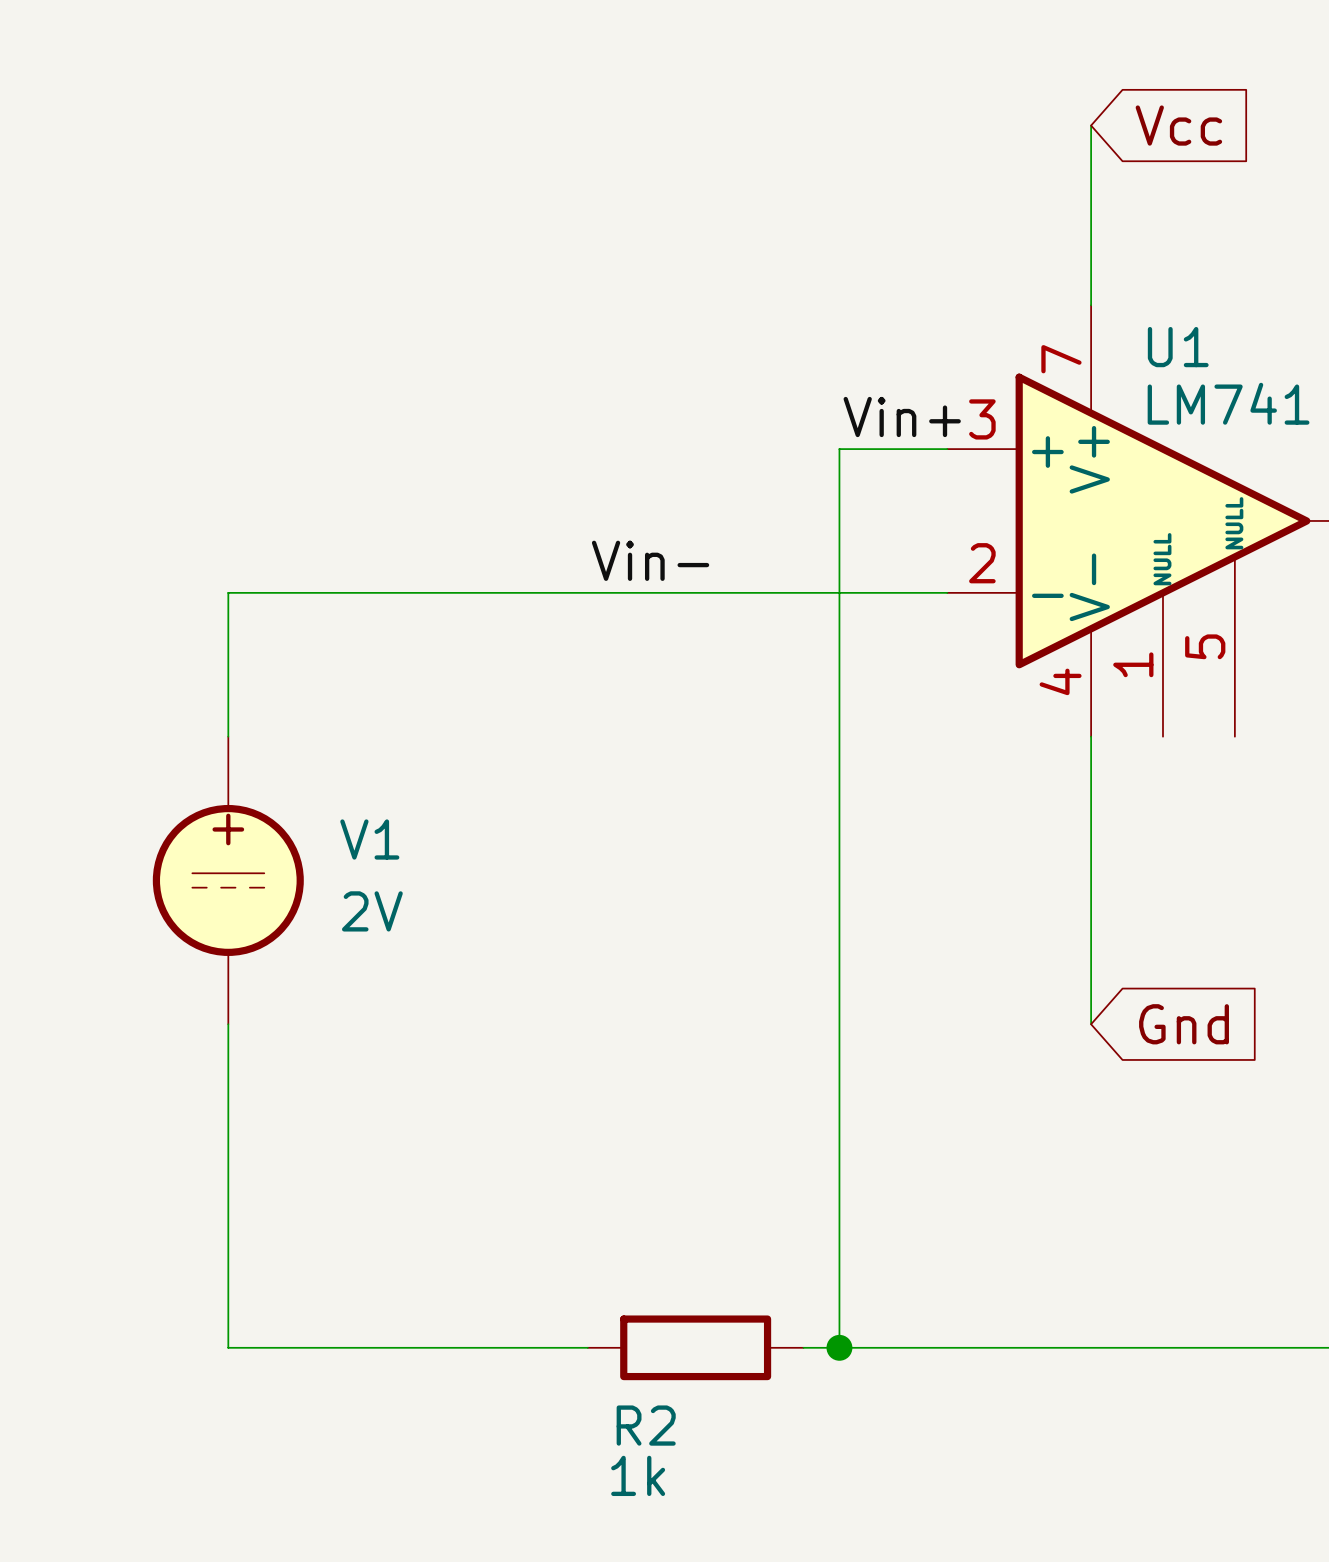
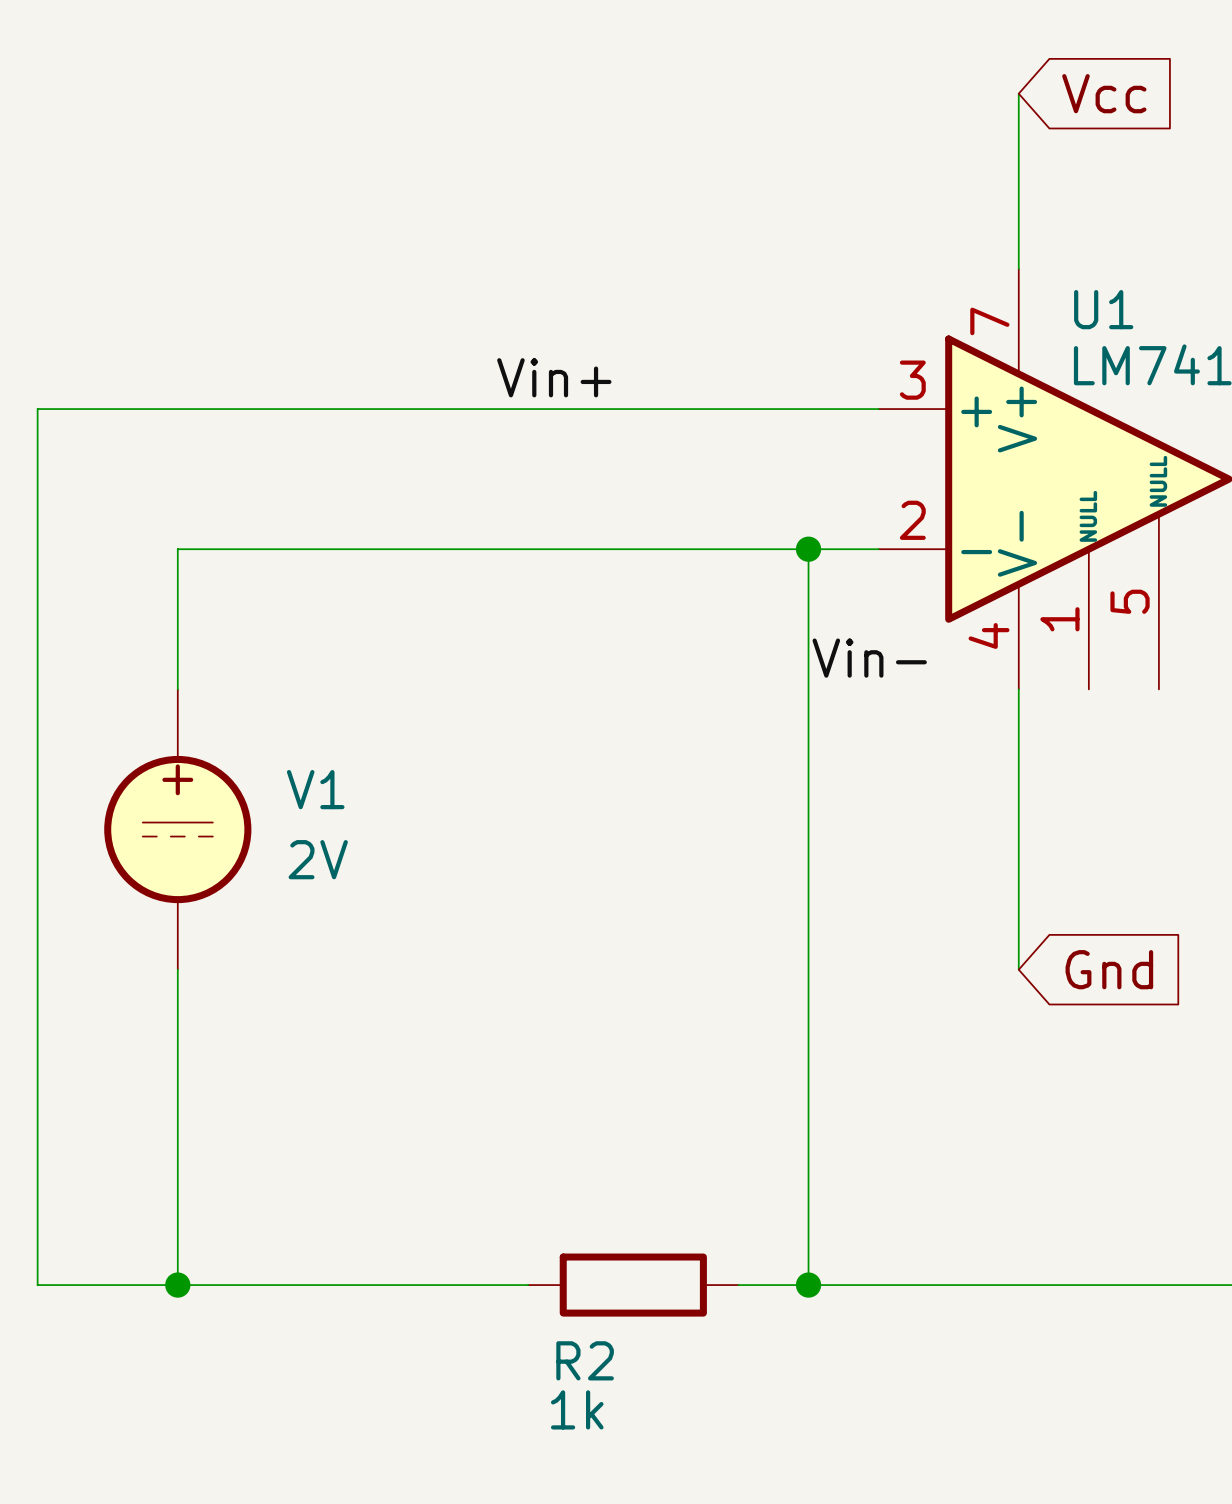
label position: Vin+ (902, 417) -> Vin+ (554, 377)
wire: (839, 449) (839, 1347) -> (773, 409) (37, 409) (37, 1285) (177, 1285)
label position: Vin- (650, 560) -> Vin- (869, 658)
wire: none -> (808, 549) (808, 1285)
junction: none -> (808, 549)
junction: none -> (177, 1285)
junction position: (839, 1347) -> (808, 1285)

